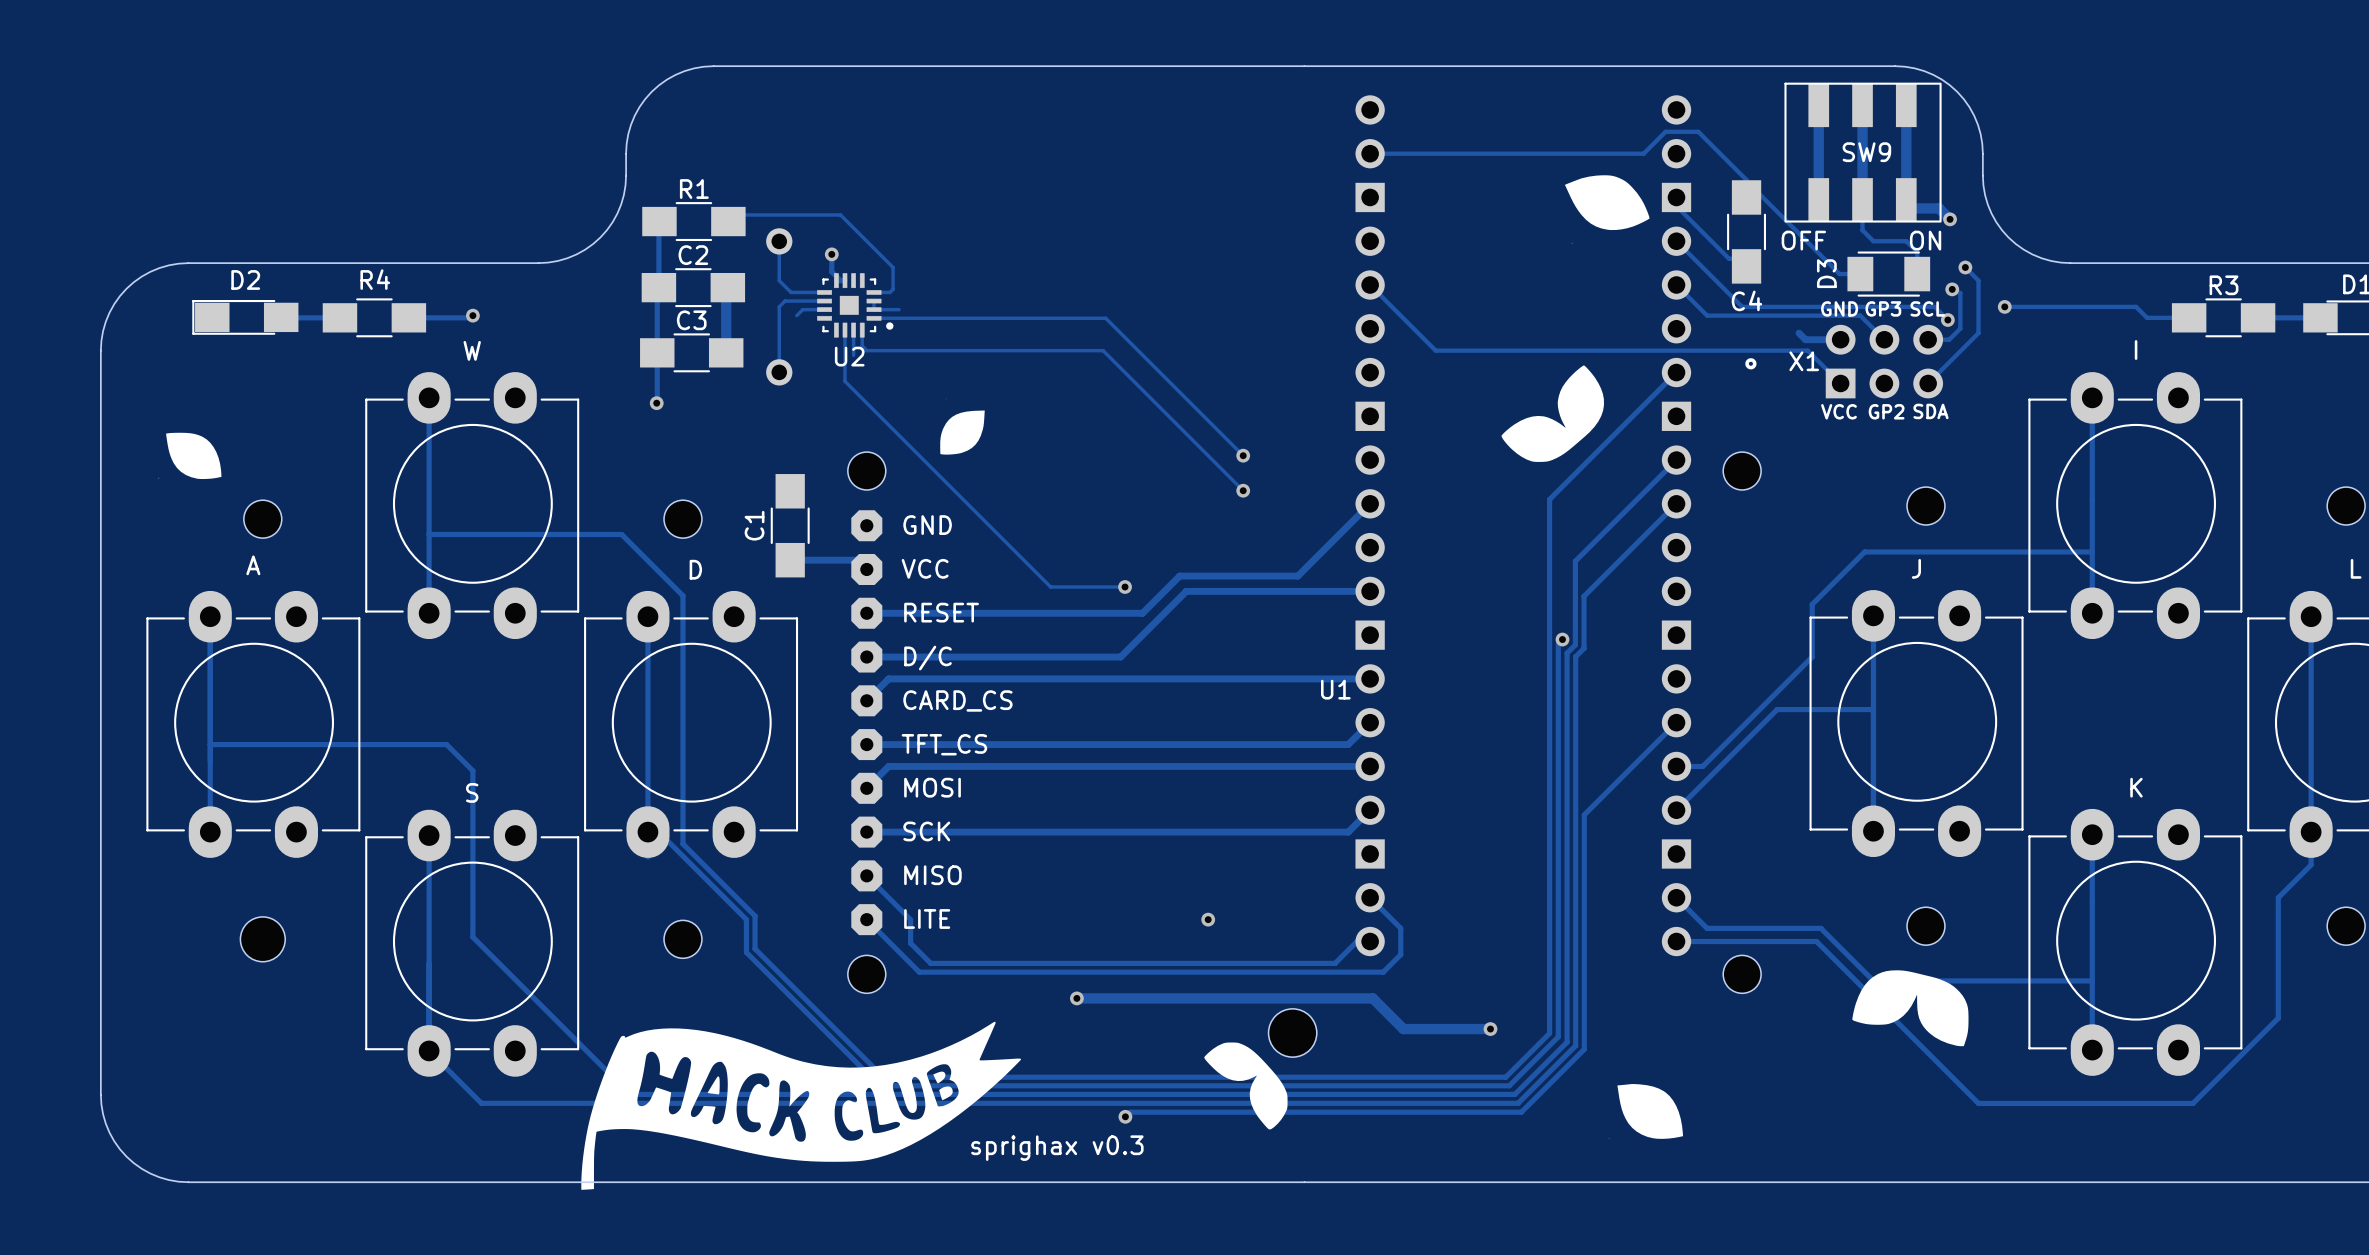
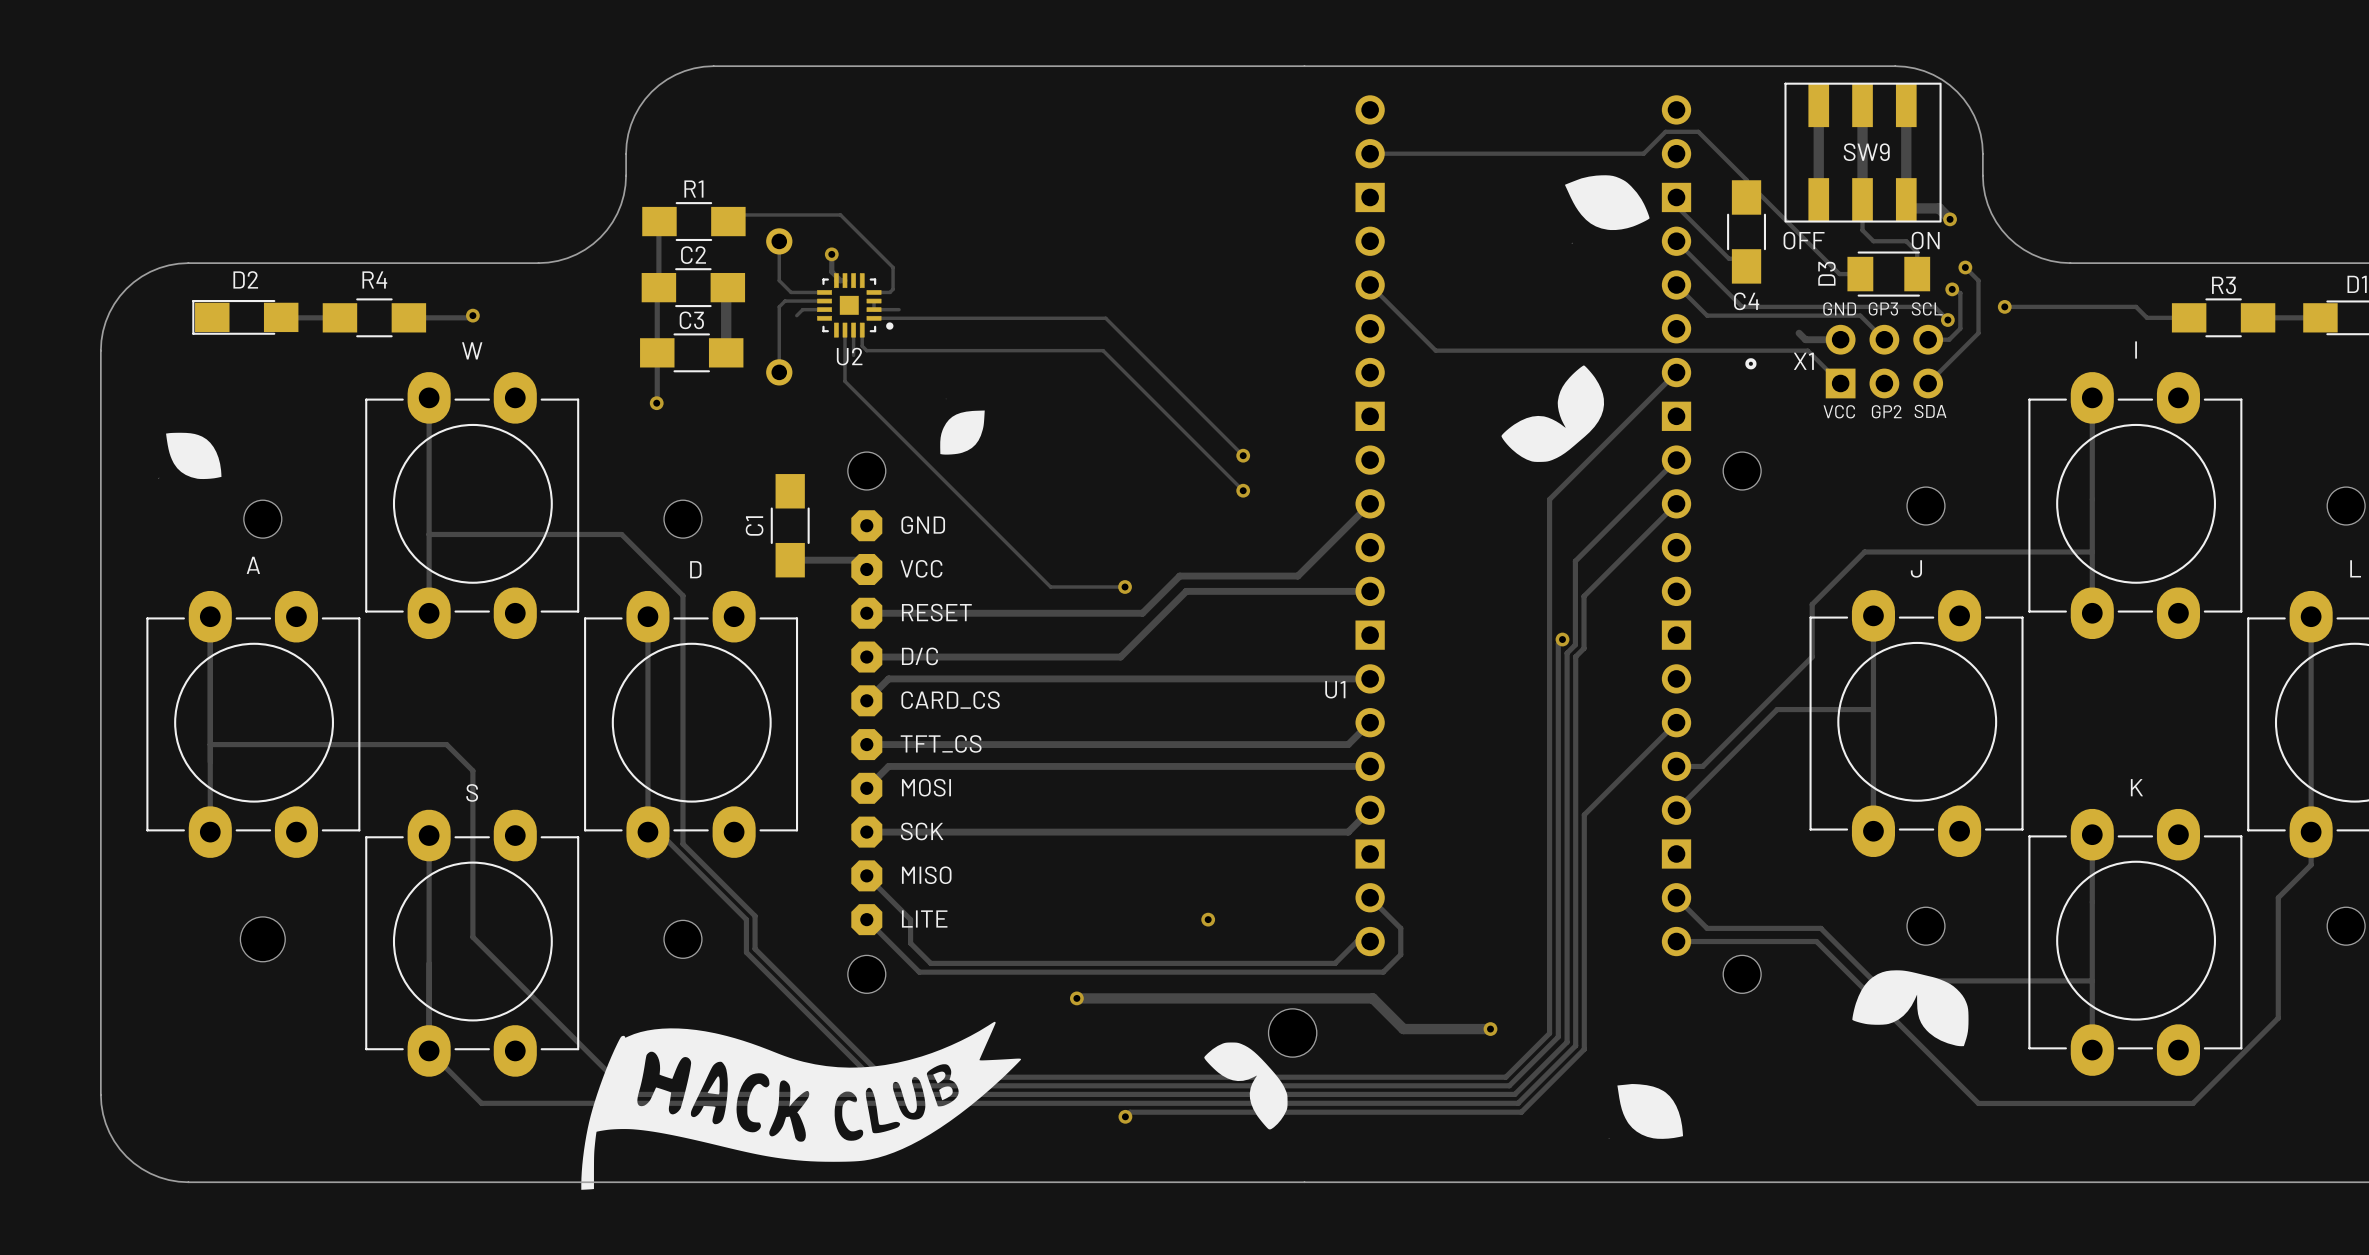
text: sprighax v0.3 (1057, 1148) -> none

